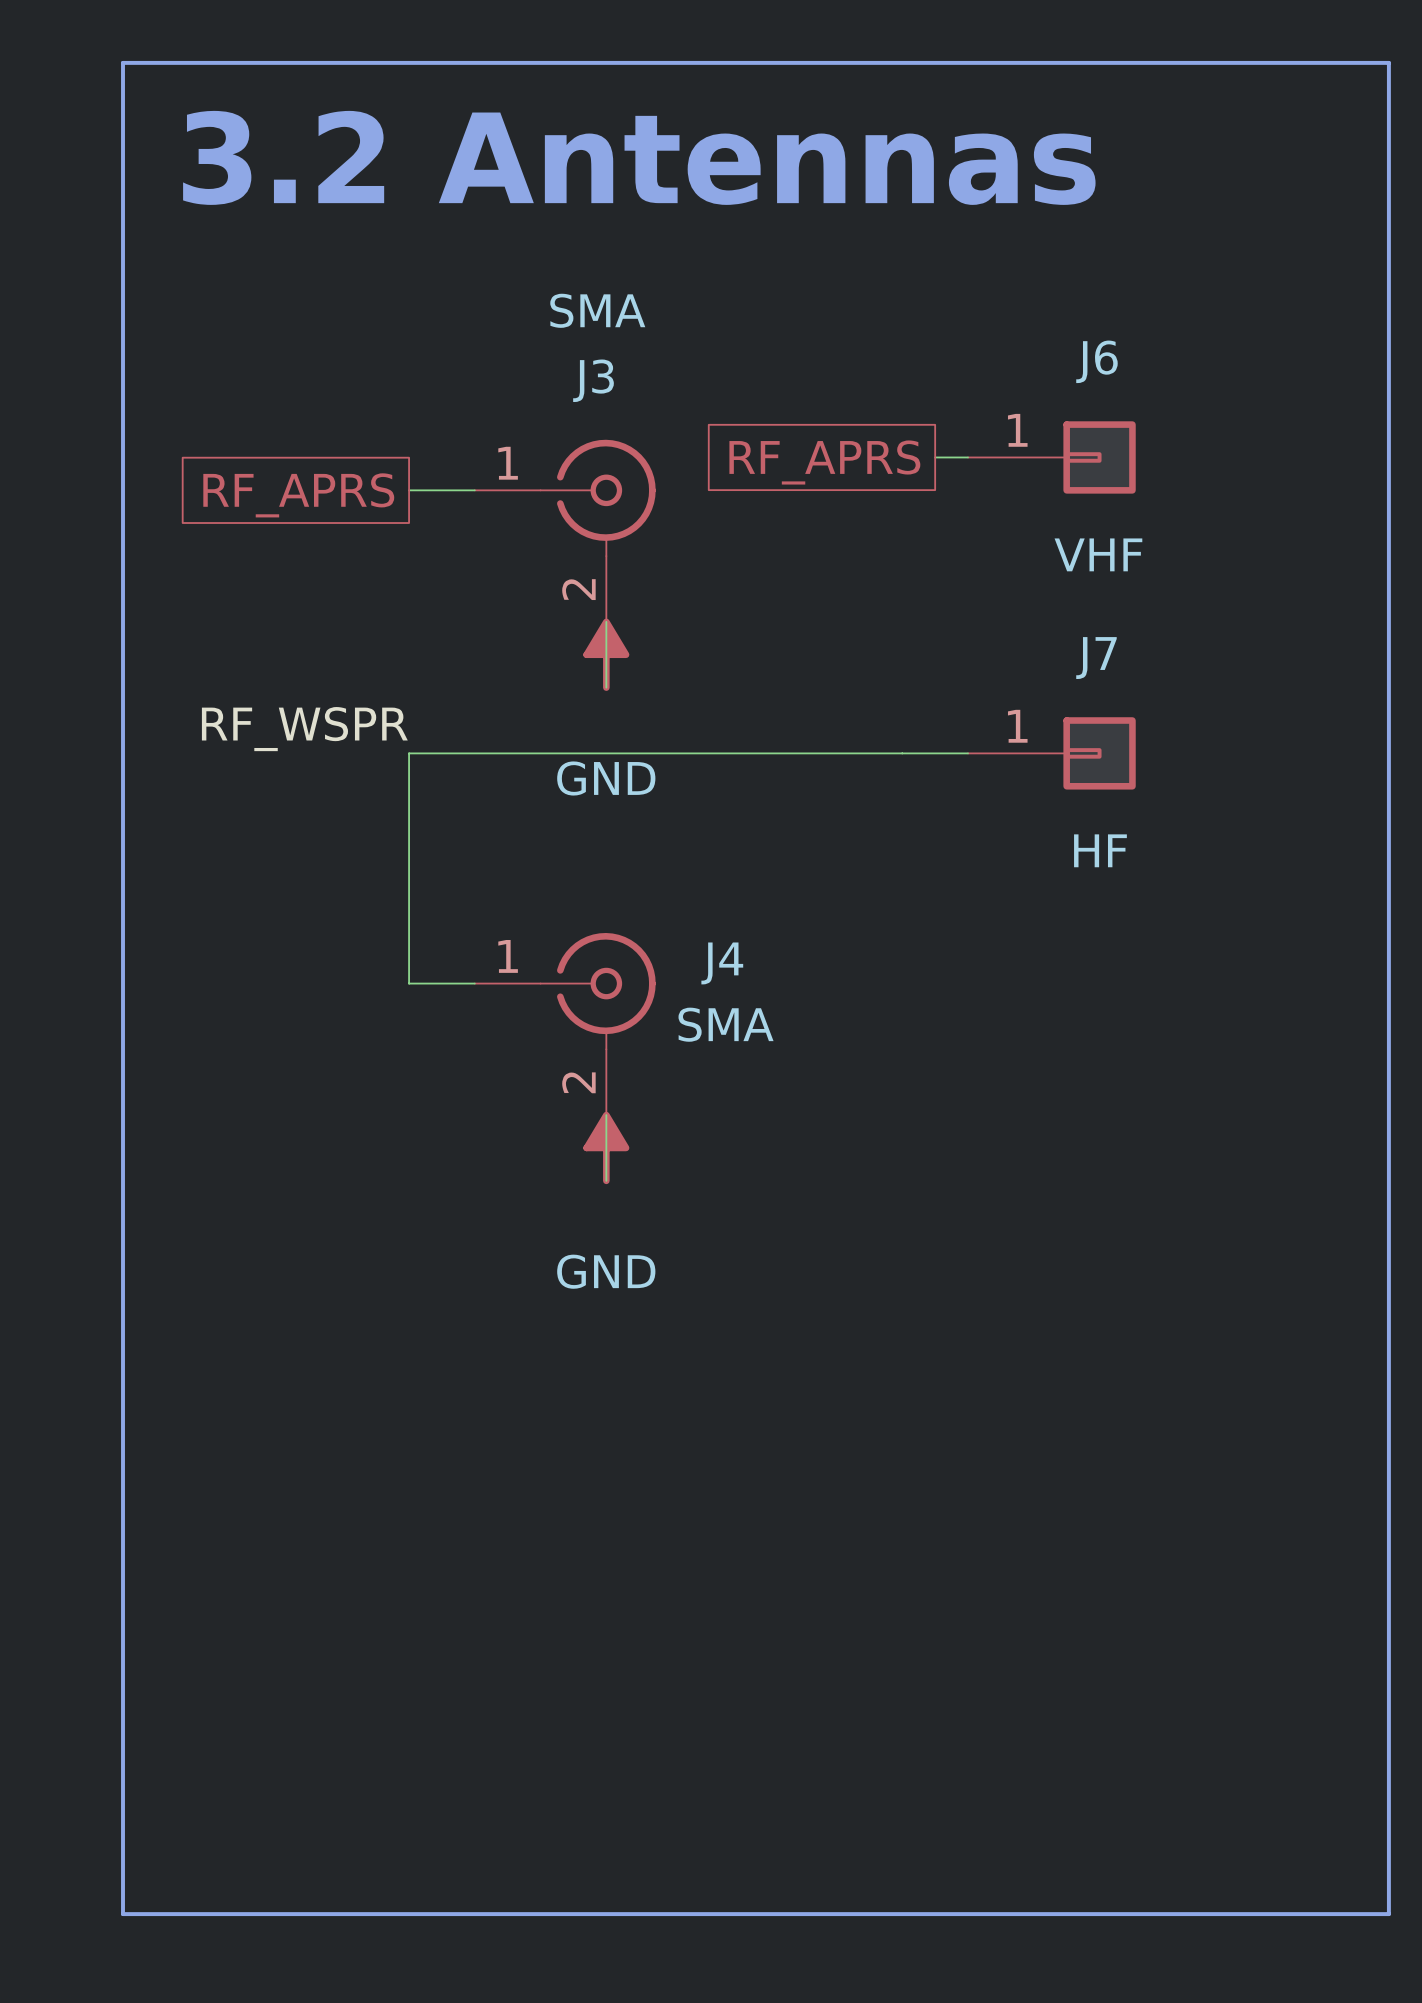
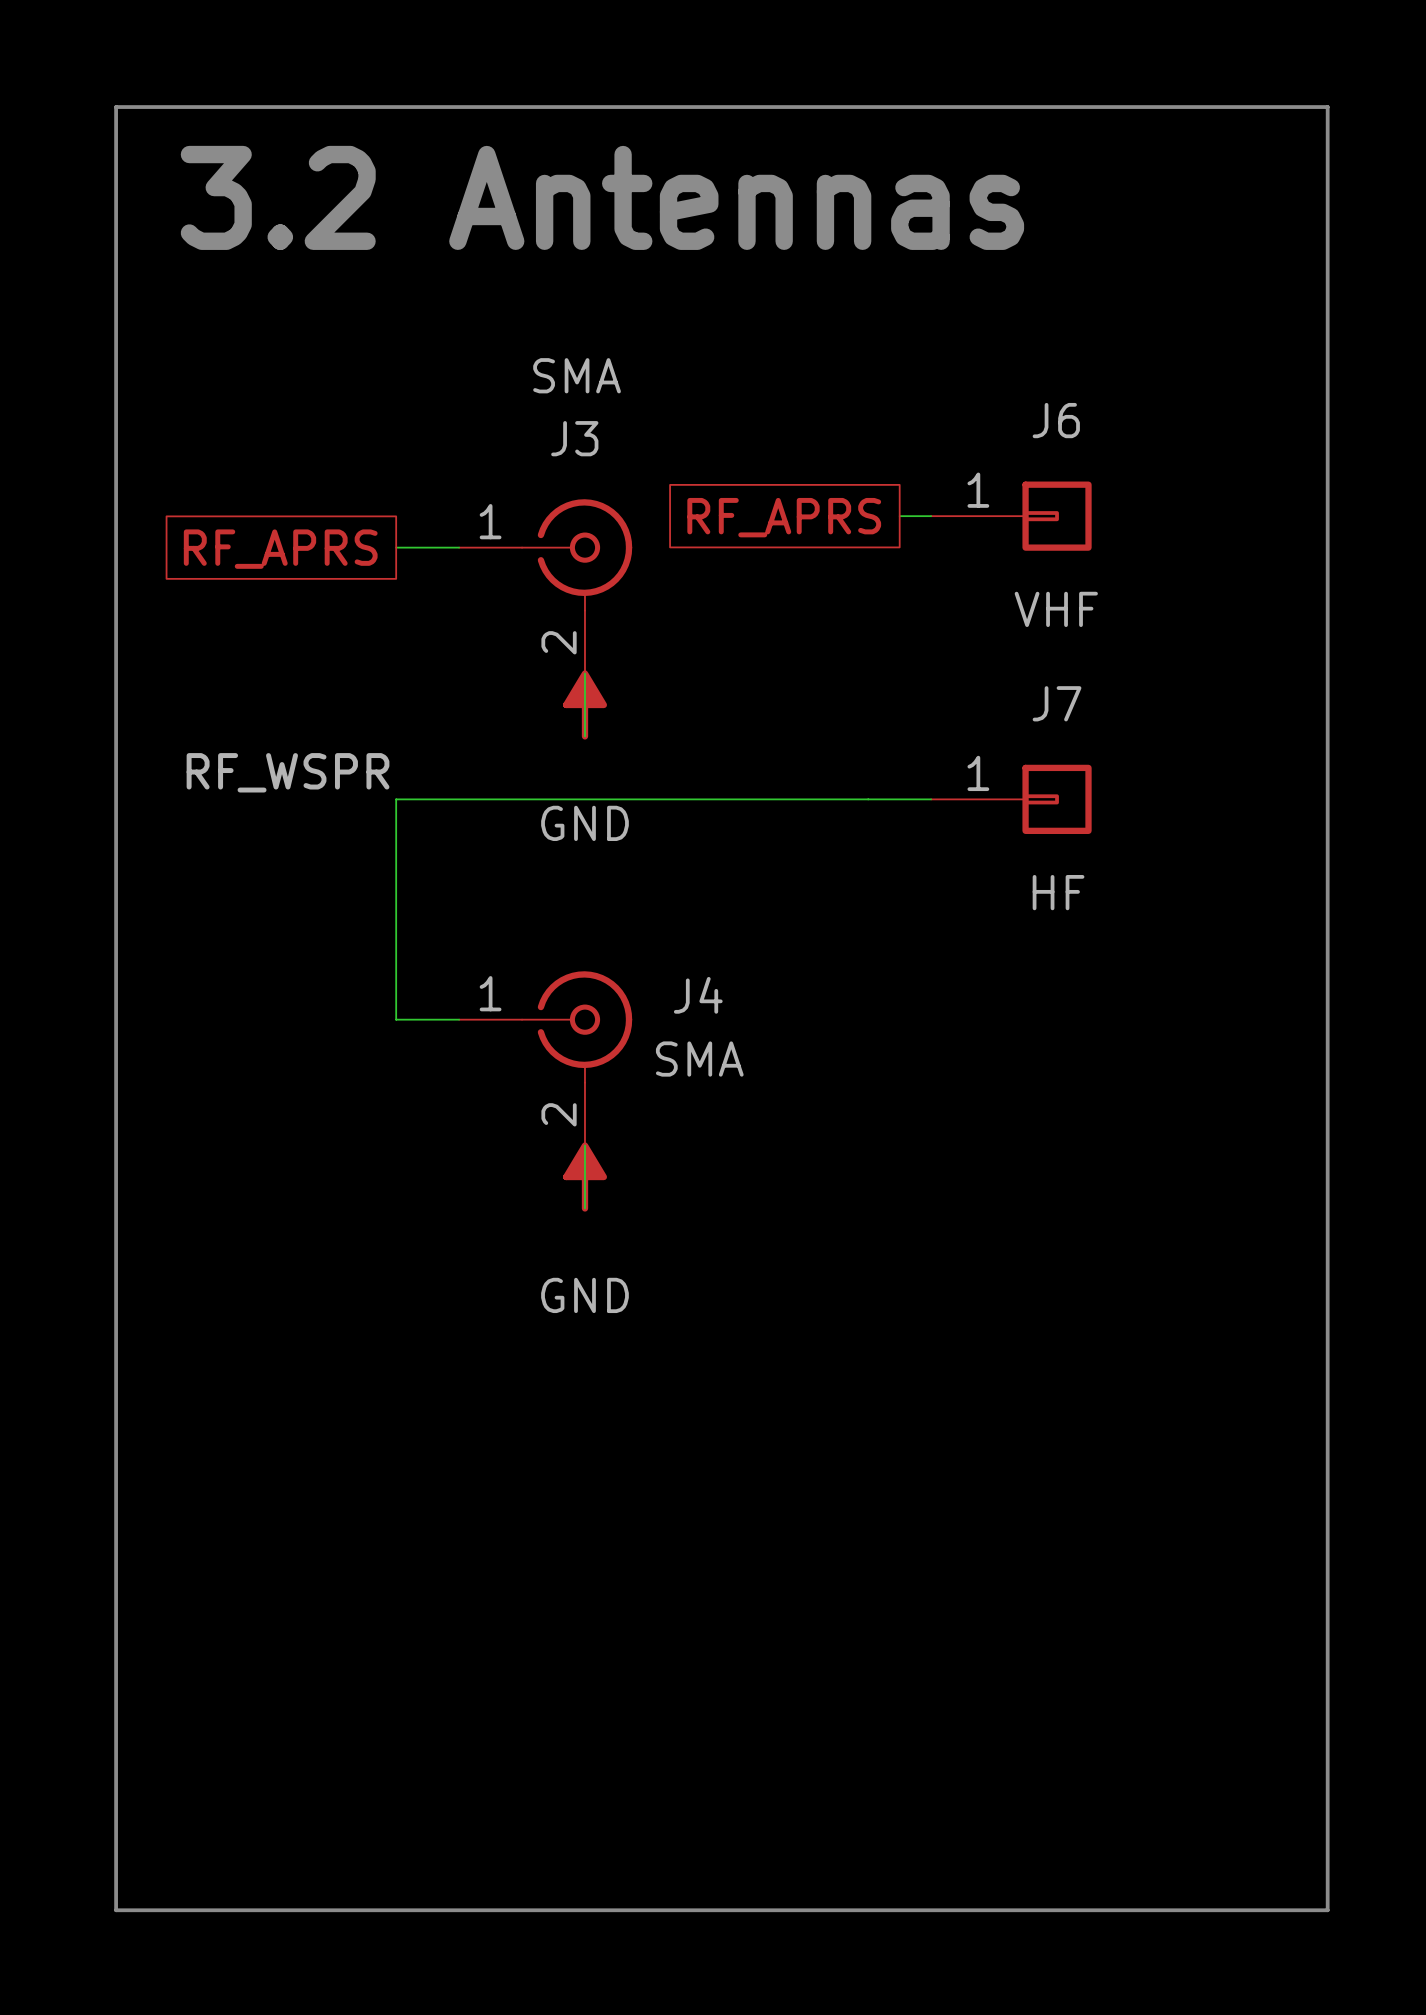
text position: 3.2 Antennas (639, 157) -> 3.2 Antennas (602, 197)
line: (123, 1914) (123, 62) (1388, 62) (1388, 1914) (1382, 1914) -> (122, 1910) (116, 1910) (116, 107) (1327, 107) (1327, 1910)

